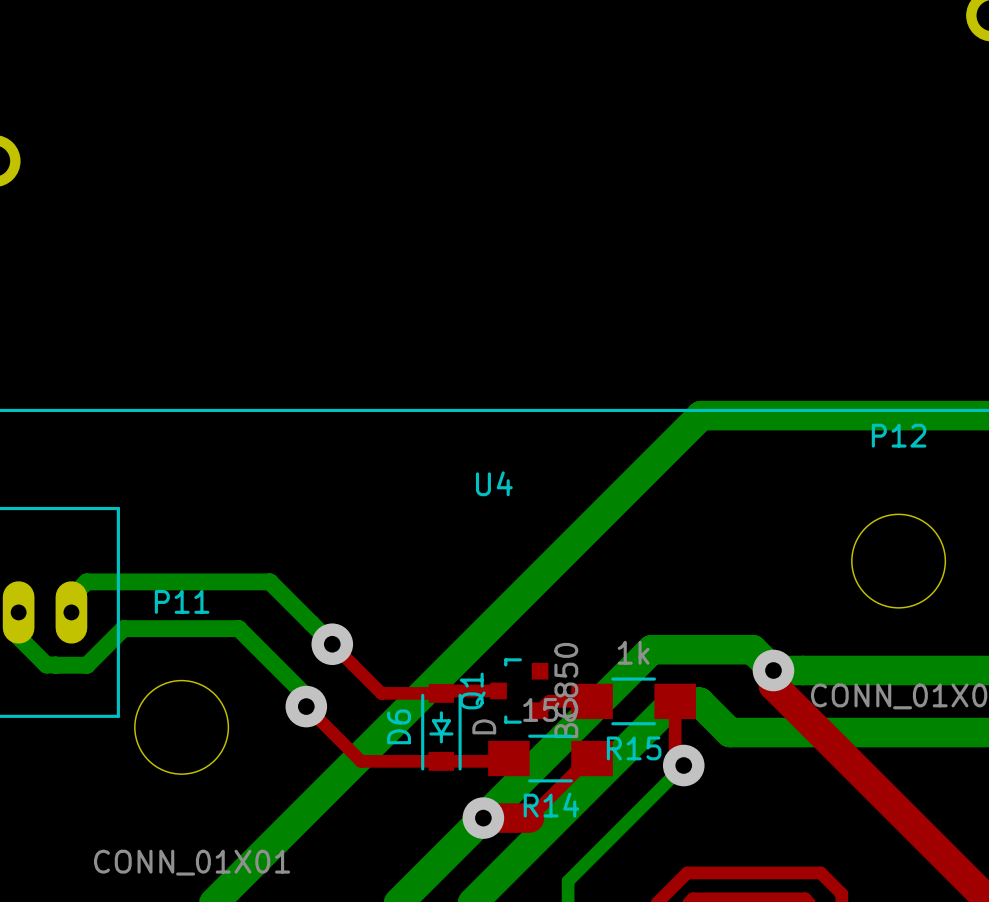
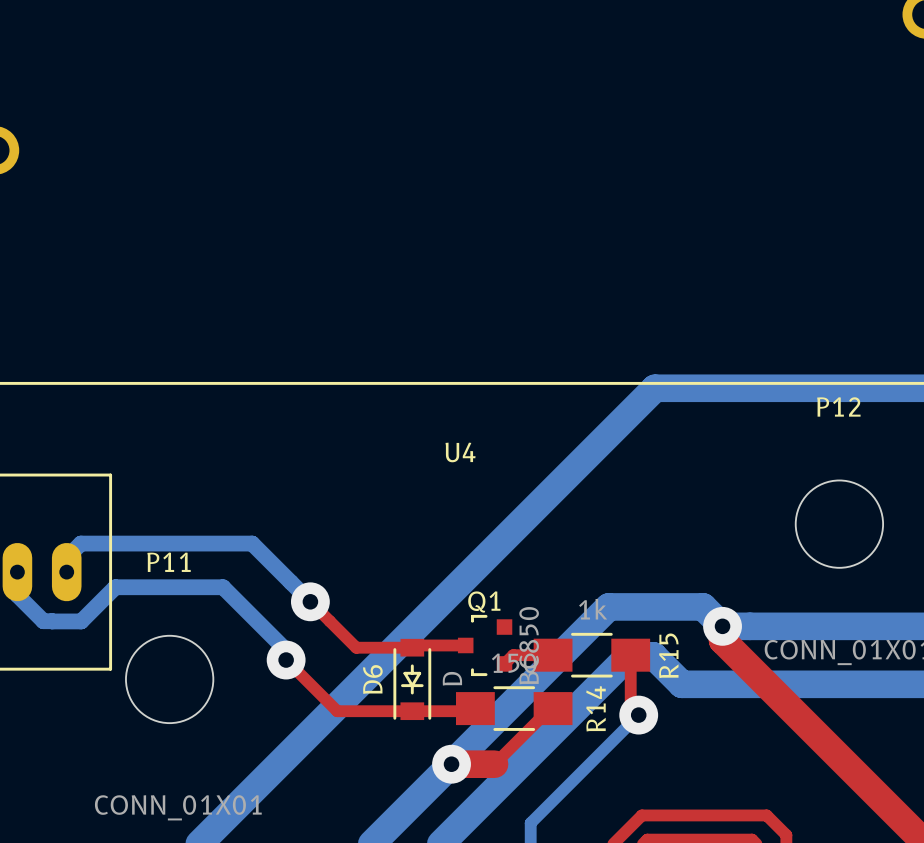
Q1 name rotation: 0° (472, 690) -> 90° clockwise (484, 602)
Q1 name position: Q1 (472, 690) -> Q1 (484, 602)
R15 name rotation: 0° (634, 748) -> 90° counterclockwise (668, 655)
R15 name position: R15 (634, 748) -> R15 (668, 655)
R14 name rotation: 0° (551, 805) -> 90° counterclockwise (596, 708)
R14 name position: R14 (551, 805) -> R14 (596, 708)

